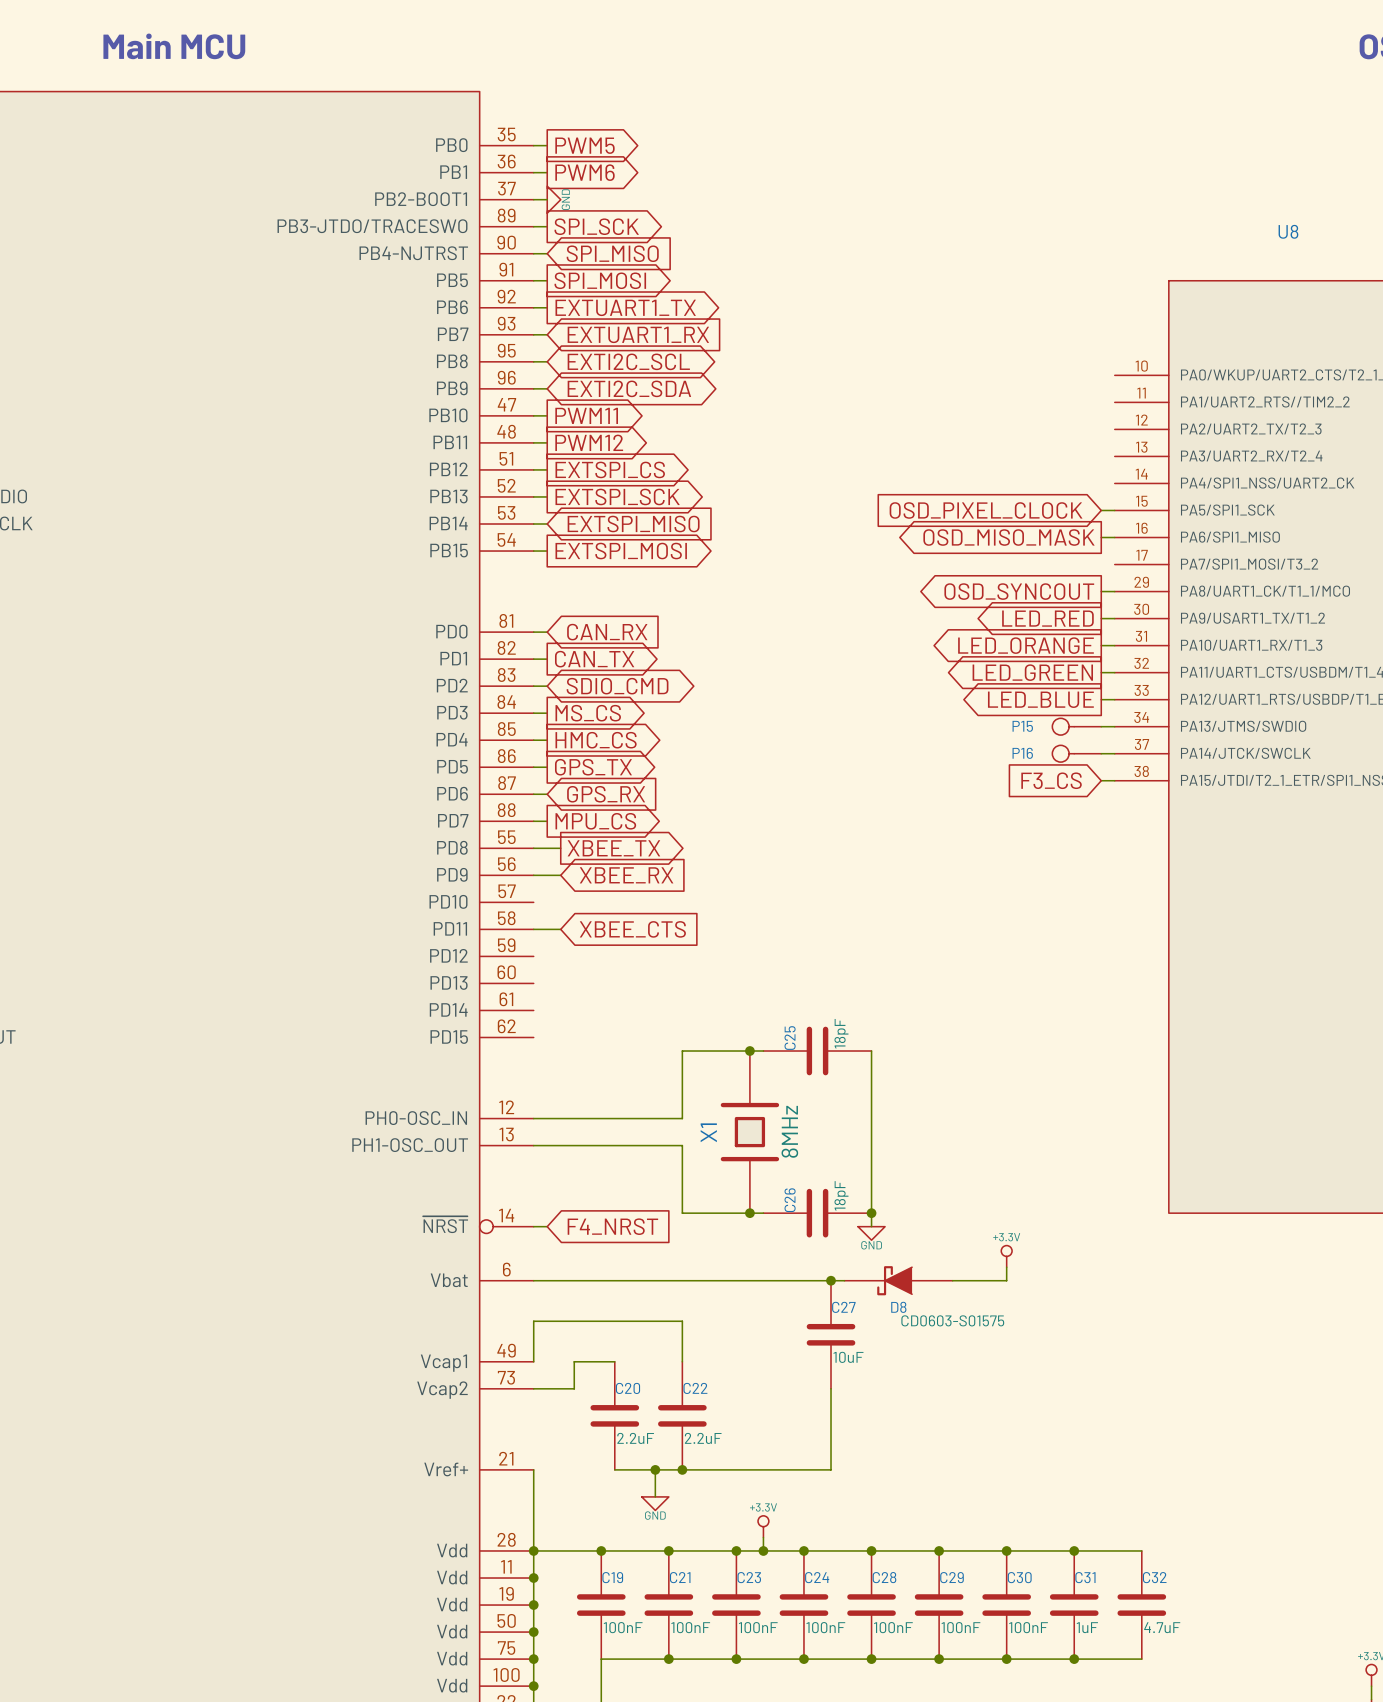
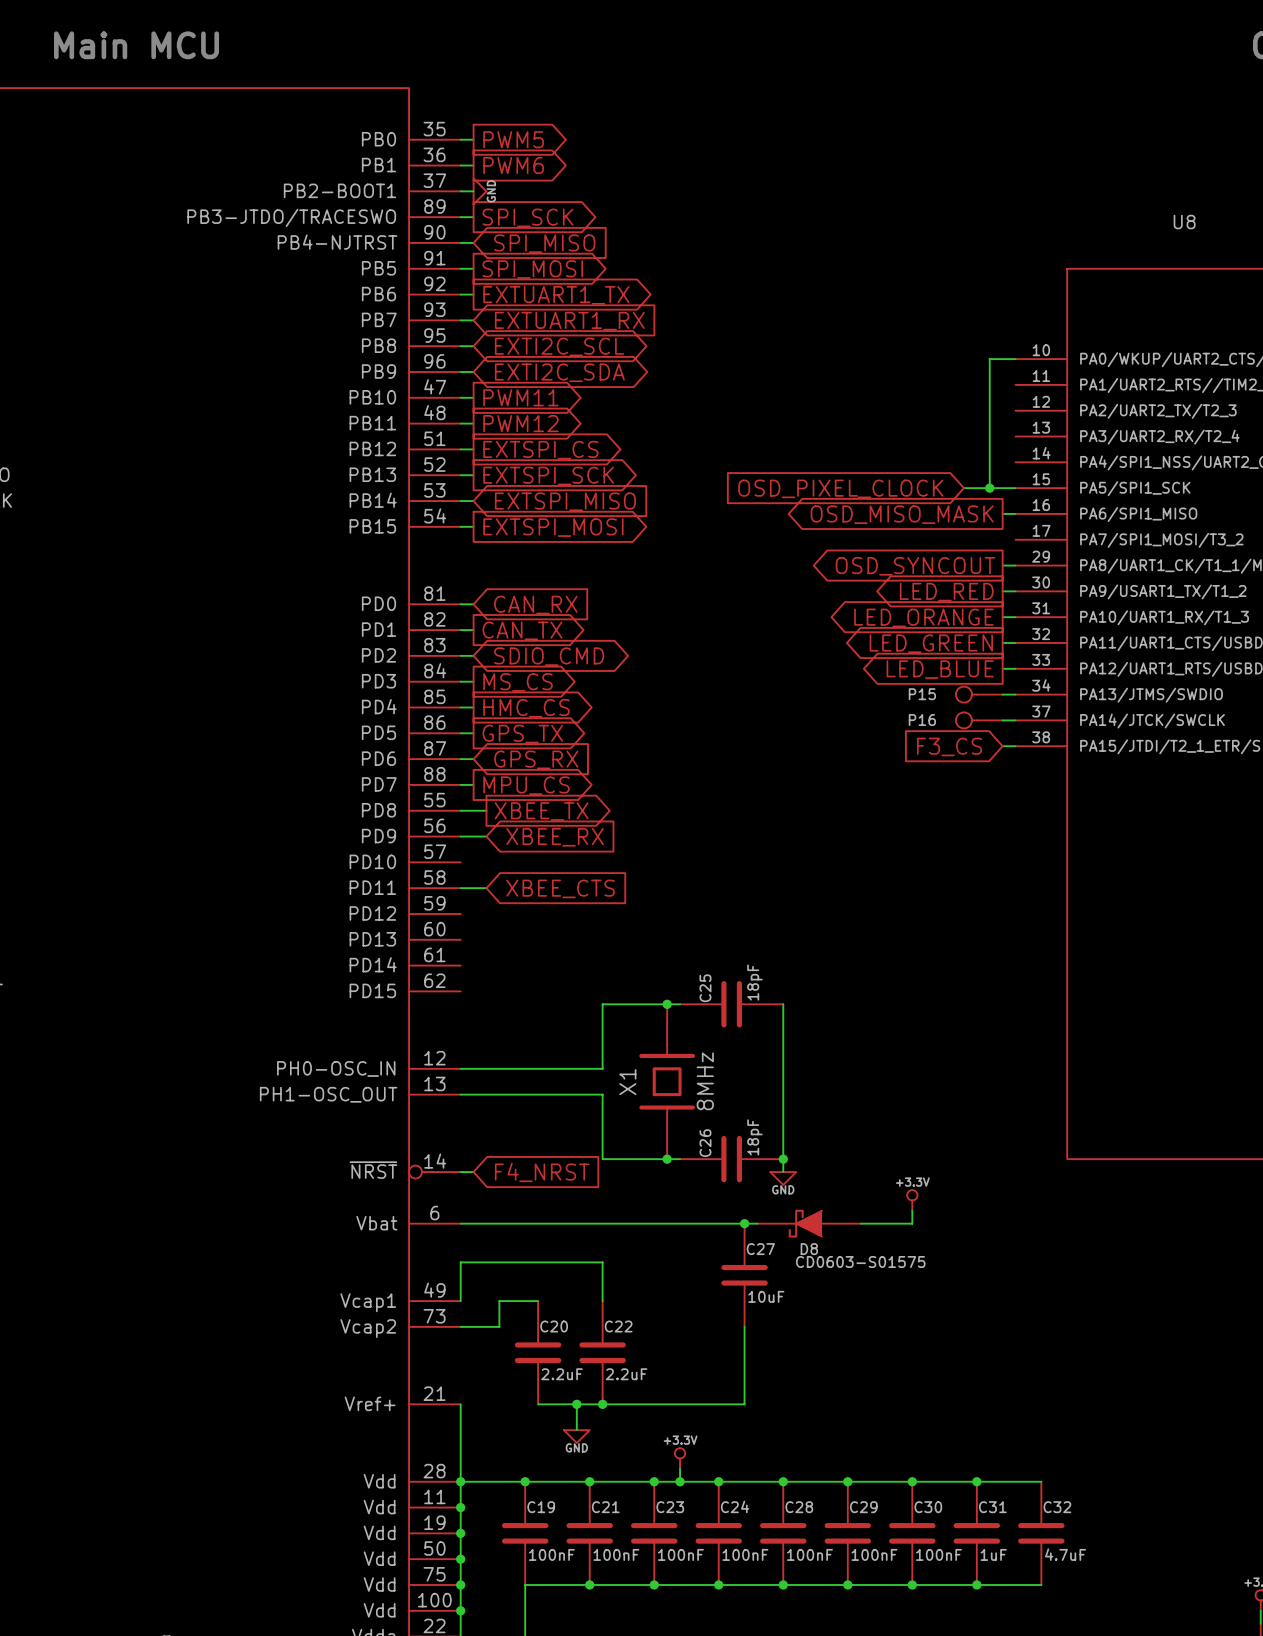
wire: none -> (1015, 359) (989, 359) (989, 488)
global label position: OSD_PIXEL_CLOCK (986, 510) -> OSD_PIXEL_CLOCK (840, 488)
wire: none -> (963, 488) (1002, 488)
junction: none -> (989, 488)

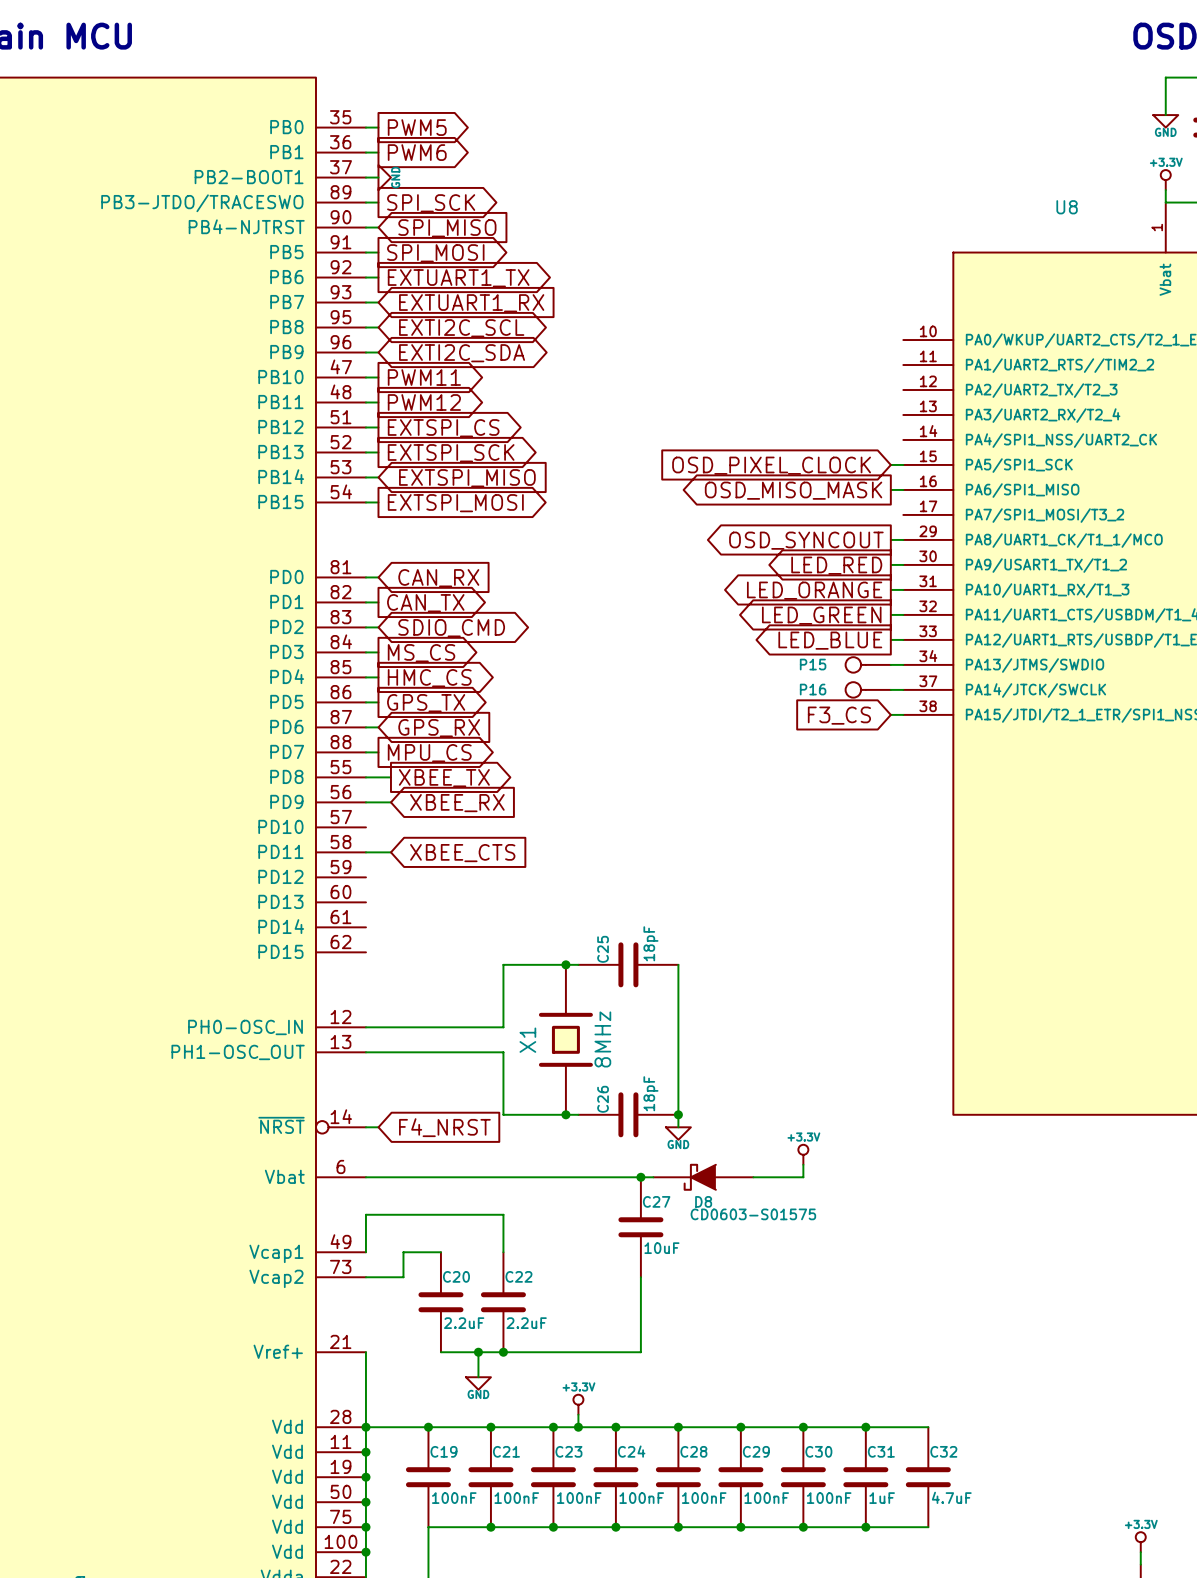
wire: (1015, 359) (989, 359) (989, 488) -> none
global label position: OSD_PIXEL_CLOCK (840, 488) -> OSD_PIXEL_CLOCK (771, 465)
wire: (963, 488) (1002, 488) -> none
junction: (989, 488) -> none

